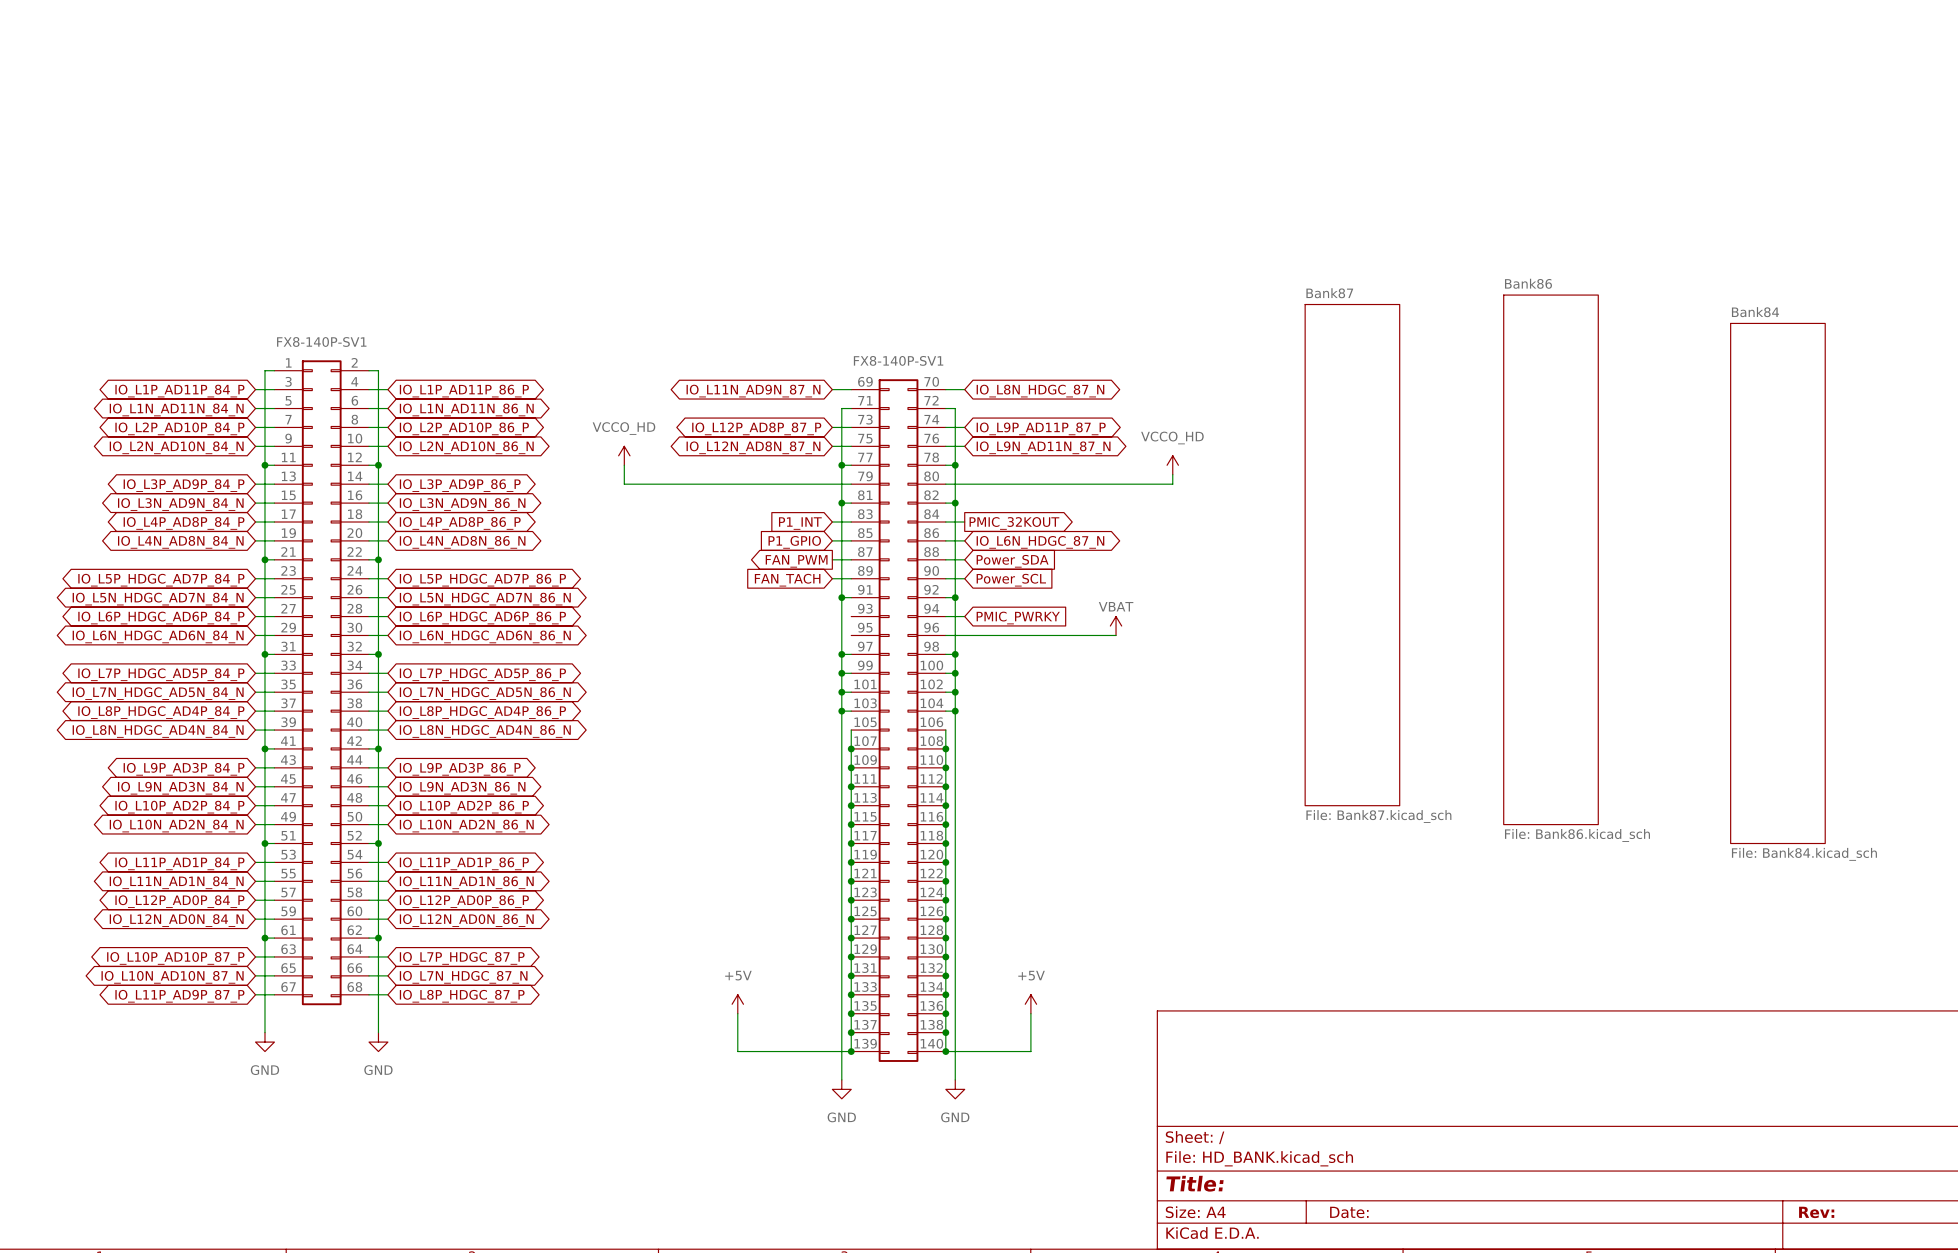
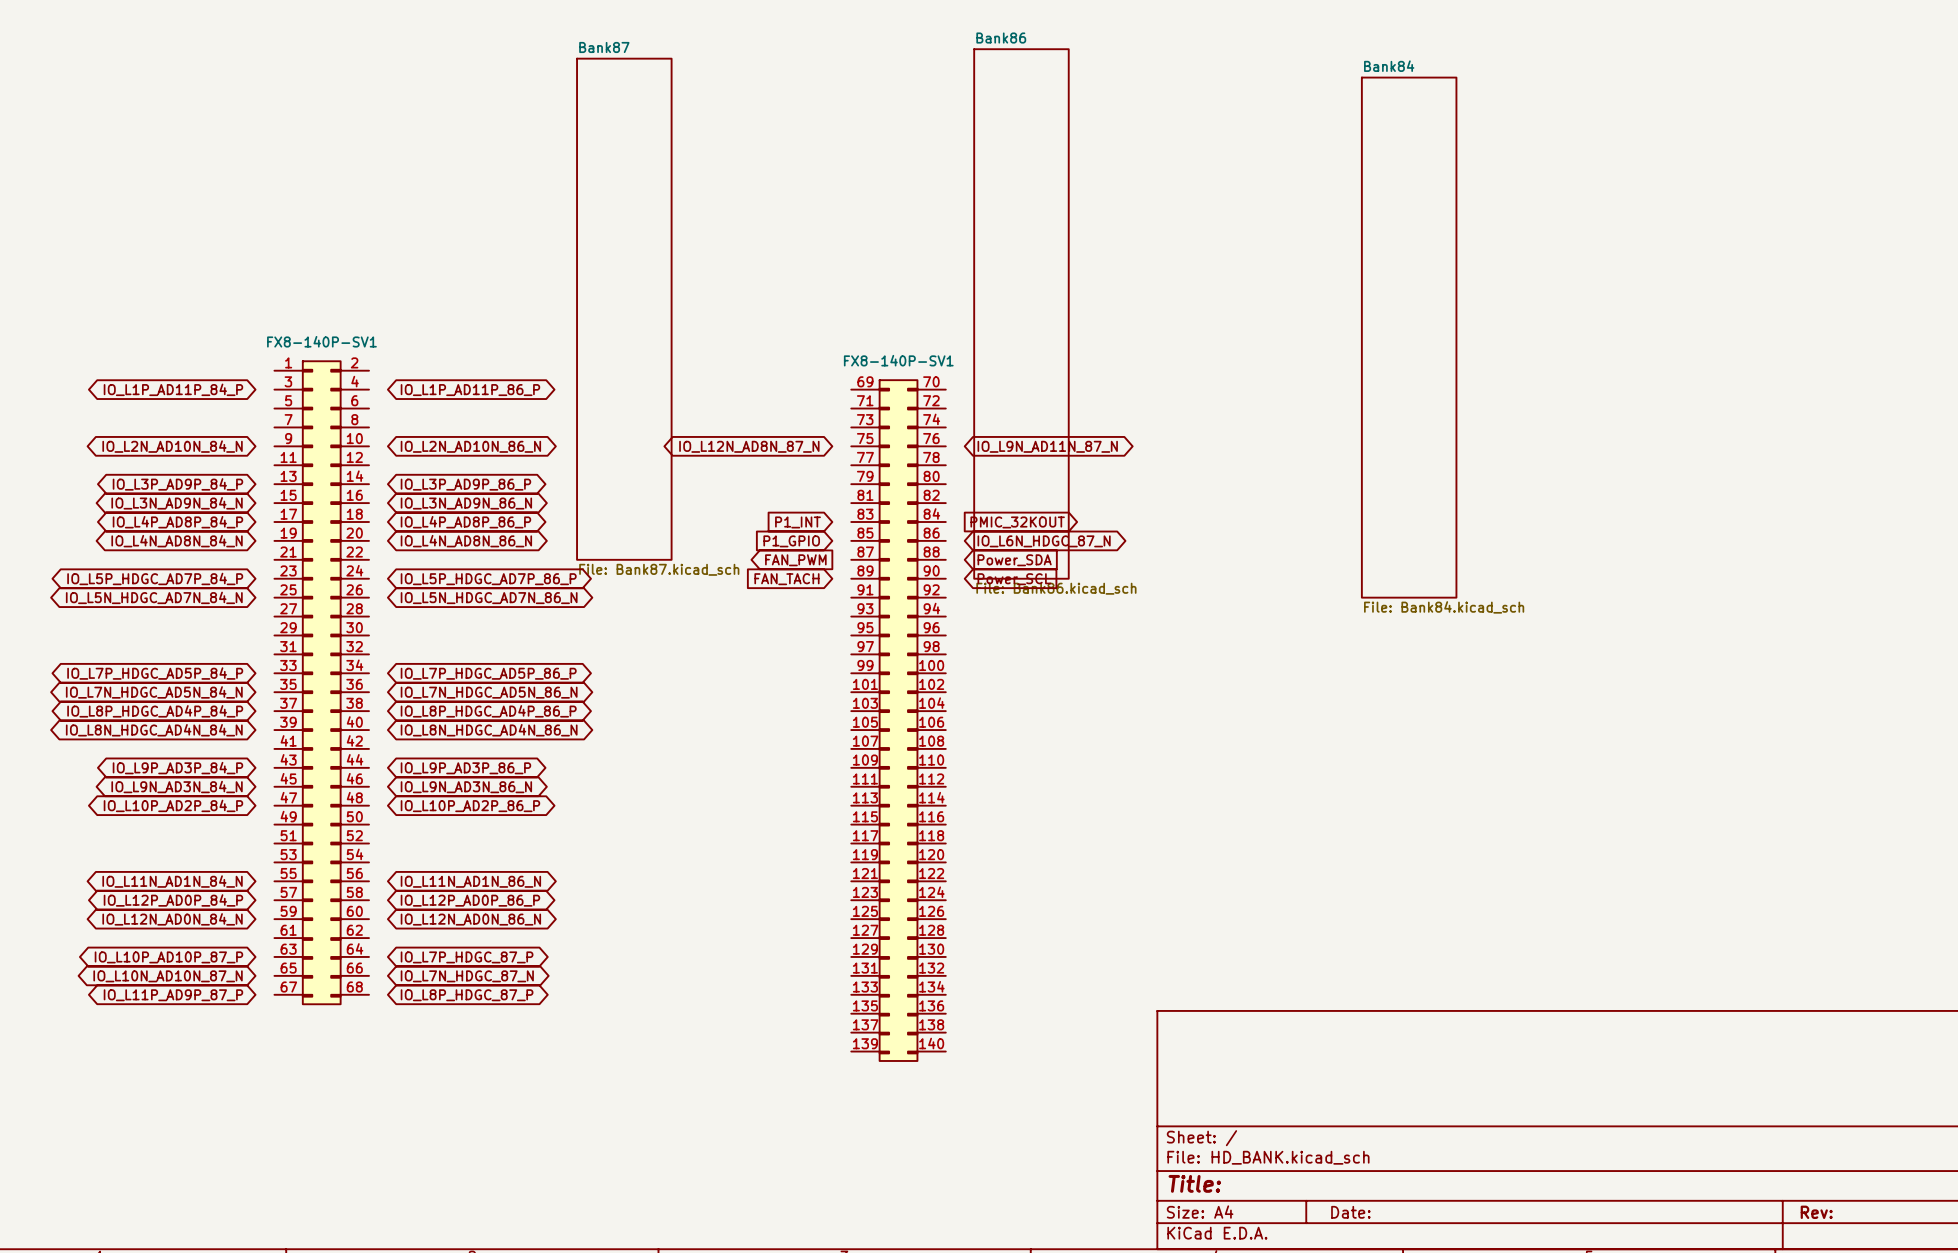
wire: (274, 370) (264, 370) (264, 1032) -> none
wire: (369, 370) (378, 370) (378, 1032) -> none
wire: (255, 389) (274, 389) -> none
wire: (369, 389) (387, 389) -> none
wire: (832, 389) (851, 389) -> none
wire: (945, 389) (964, 389) -> none
global label: IO_L11N_AD9N_87_N (753, 391) -> none
global label: IO_L8N_HDGC_87_N (1040, 391) -> none
wire: (255, 408) (274, 408) -> none
wire: (369, 408) (387, 408) -> none
wire: (851, 408) (841, 408) (841, 1079) -> none
wire: (945, 408) (955, 408) (955, 1079) -> none
global label: IO_L1N_AD11N_84_N (176, 409) -> none
global label: IO_L1N_AD11N_86_N (466, 409) -> none
wire: (255, 427) (274, 427) -> none
wire: (369, 427) (387, 427) -> none
wire: (832, 427) (851, 427) -> none
wire: (945, 427) (964, 427) -> none
global label: IO_L2P_AD10P_84_P (179, 428) -> none
global label: IO_L2P_AD10P_86_P (464, 428) -> none
global label: IO_L12P_AD8P_87_P (756, 428) -> none
global label: IO_L9P_AD11P_87_P (1041, 428) -> none
wire: (255, 446) (274, 446) -> none
wire: (369, 446) (387, 446) -> none
wire: (832, 446) (851, 446) -> none
wire: (945, 446) (964, 446) -> none
power symbol: VCCO_HD (624, 455) -> none
wire: (264, 465) (274, 465) -> none
junction: (264, 465) -> none
wire: (369, 465) (378, 465) -> none
junction: (378, 465) -> none
wire: (624, 465) (624, 484) (851, 484) -> none
wire: (841, 465) (851, 465) -> none
junction: (841, 465) -> none
wire: (945, 465) (955, 465) -> none
junction: (955, 465) -> none
power symbol: VCCO_HD (1172, 465) -> none
wire: (1172, 474) (1172, 484) (945, 484) -> none
wire: (255, 484) (274, 484) -> none
wire: (369, 484) (387, 484) -> none
wire: (255, 503) (274, 503) -> none
wire: (369, 503) (387, 503) -> none
wire: (841, 503) (851, 503) -> none
junction: (841, 503) -> none
wire: (945, 503) (955, 503) -> none
junction: (955, 503) -> none
wire: (255, 522) (274, 522) -> none
wire: (369, 522) (387, 522) -> none
wire: (832, 522) (851, 522) -> none
wire: (945, 522) (964, 522) -> none
wire: (255, 540) (274, 540) -> none
wire: (369, 540) (387, 540) -> none
wire: (832, 540) (851, 540) -> none
wire: (945, 540) (964, 540) -> none
sheet Bank87 position: (1352, 555) -> (624, 309)
wire: (264, 559) (274, 559) -> none
junction: (264, 559) -> none
wire: (369, 559) (378, 559) -> none
junction: (378, 559) -> none
wire: (832, 559) (851, 559) -> none
wire: (945, 559) (964, 559) -> none
sheet Bank86 position: (1550, 559) -> (1021, 313)
wire: (255, 578) (274, 578) -> none
wire: (369, 578) (387, 578) -> none
wire: (832, 578) (851, 578) -> none
wire: (945, 578) (964, 578) -> none
sheet Bank84 position: (1777, 583) -> (1409, 337)
wire: (255, 597) (274, 597) -> none
wire: (369, 597) (387, 597) -> none
wire: (841, 597) (851, 597) -> none
junction: (841, 597) -> none
wire: (945, 597) (955, 597) -> none
junction: (955, 597) -> none
wire: (255, 616) (274, 616) -> none
wire: (369, 616) (387, 616) -> none
wire: (945, 616) (964, 616) -> none
global label: IO_L6P_HDGC_AD6P_84_P (161, 618) -> none
global label: IO_L6P_HDGC_AD6P_86_P (482, 618) -> none
global label: PMIC_PWRKY (1018, 618) -> none
power symbol: VBAT (1116, 626) -> none
wire: (255, 635) (274, 635) -> none
wire: (369, 635) (387, 635) -> none
wire: (945, 635) (1116, 635) -> none
global label: IO_L6N_HDGC_AD6N_84_N (158, 636) -> none
global label: IO_L6N_HDGC_AD6N_86_N (485, 636) -> none
wire: (264, 654) (274, 654) -> none
junction: (264, 654) -> none
wire: (369, 654) (378, 654) -> none
junction: (378, 654) -> none
wire: (841, 654) (851, 654) -> none
junction: (841, 654) -> none
wire: (945, 654) (955, 654) -> none
junction: (955, 654) -> none
wire: (255, 673) (274, 673) -> none
wire: (369, 673) (387, 673) -> none
wire: (841, 673) (851, 673) -> none
junction: (841, 673) -> none
wire: (945, 673) (955, 673) -> none
junction: (955, 673) -> none
wire: (255, 692) (274, 692) -> none
wire: (369, 692) (387, 692) -> none
wire: (841, 692) (851, 692) -> none
junction: (841, 692) -> none
wire: (945, 692) (955, 692) -> none
junction: (955, 692) -> none
wire: (255, 711) (274, 711) -> none
wire: (369, 711) (387, 711) -> none
wire: (841, 711) (851, 711) -> none
junction: (841, 711) -> none
wire: (945, 711) (955, 711) -> none
junction: (955, 711) -> none
wire: (255, 730) (274, 730) -> none
wire: (369, 730) (387, 730) -> none
wire: (851, 730) (851, 1051) (737, 1051) (737, 1013) -> none
wire: (945, 730) (945, 1051) (1030, 1051) (1030, 1013) -> none
wire: (264, 748) (274, 748) -> none
junction: (264, 748) -> none
wire: (369, 748) (378, 748) -> none
junction: (378, 748) -> none
junction: (851, 748) -> none
junction: (945, 748) -> none
wire: (255, 767) (274, 767) -> none
wire: (369, 767) (387, 767) -> none
junction: (851, 767) -> none
junction: (945, 767) -> none
wire: (255, 786) (274, 786) -> none
wire: (369, 786) (387, 786) -> none
junction: (851, 786) -> none
junction: (945, 786) -> none
wire: (255, 805) (274, 805) -> none
wire: (369, 805) (387, 805) -> none
junction: (851, 805) -> none
junction: (945, 805) -> none
wire: (255, 824) (274, 824) -> none
wire: (369, 824) (387, 824) -> none
junction: (851, 824) -> none
junction: (945, 824) -> none
global label: IO_L10N_AD2N_84_N (176, 826) -> none
global label: IO_L10N_AD2N_86_N (466, 826) -> none
wire: (264, 843) (274, 843) -> none
junction: (264, 843) -> none
wire: (369, 843) (378, 843) -> none
junction: (378, 843) -> none
junction: (851, 843) -> none
junction: (945, 843) -> none
wire: (255, 862) (274, 862) -> none
wire: (369, 862) (387, 862) -> none
junction: (851, 862) -> none
junction: (945, 862) -> none
global label: IO_L11P_AD1P_84_P (179, 863) -> none
global label: IO_L11P_AD1P_86_P (464, 863) -> none
wire: (255, 881) (274, 881) -> none
wire: (369, 881) (387, 881) -> none
junction: (851, 881) -> none
junction: (945, 881) -> none
wire: (255, 900) (274, 900) -> none
wire: (369, 900) (387, 900) -> none
junction: (851, 900) -> none
junction: (945, 900) -> none
wire: (255, 919) (274, 919) -> none
wire: (369, 919) (387, 919) -> none
junction: (851, 919) -> none
junction: (945, 919) -> none
wire: (264, 938) (274, 938) -> none
junction: (264, 938) -> none
wire: (369, 938) (378, 938) -> none
junction: (378, 938) -> none
junction: (851, 938) -> none
junction: (945, 938) -> none
wire: (255, 956) (274, 956) -> none
wire: (369, 956) (387, 956) -> none
junction: (851, 956) -> none
junction: (945, 956) -> none
wire: (255, 975) (274, 975) -> none
wire: (369, 975) (387, 975) -> none
junction: (851, 975) -> none
junction: (945, 975) -> none
wire: (255, 994) (274, 994) -> none
wire: (369, 994) (387, 994) -> none
junction: (851, 994) -> none
junction: (945, 994) -> none
power symbol: +5V (737, 1004) -> none
power symbol: +5V (1030, 1004) -> none
junction: (851, 1013) -> none
junction: (945, 1013) -> none
junction: (851, 1032) -> none
junction: (945, 1032) -> none
power symbol: GND (264, 1042) -> none
power symbol: GND (378, 1042) -> none
junction: (851, 1051) -> none
junction: (945, 1051) -> none
power symbol: GND (841, 1089) -> none
power symbol: GND (955, 1089) -> none

